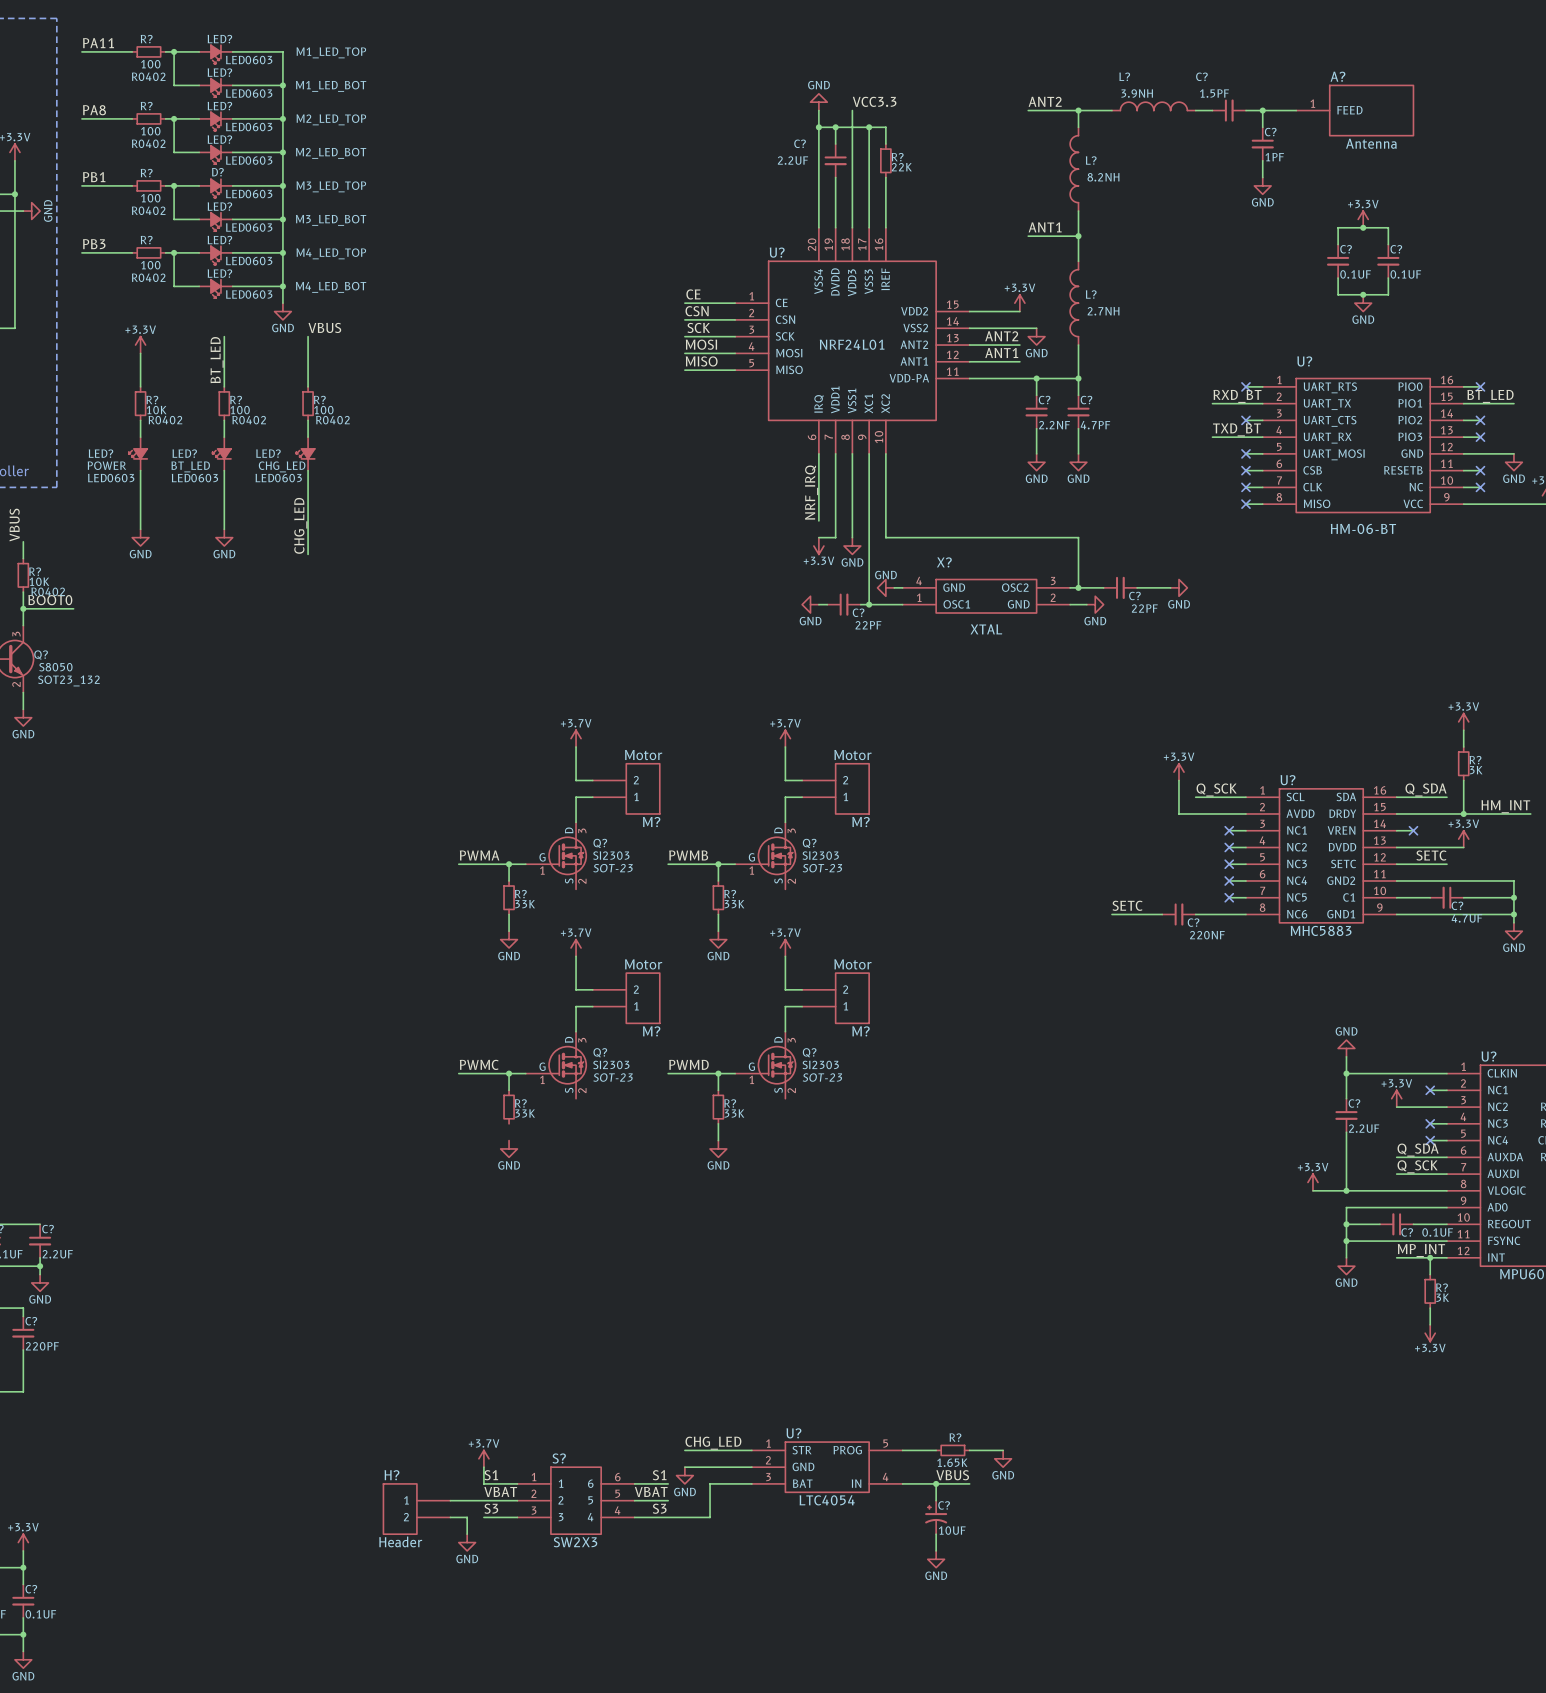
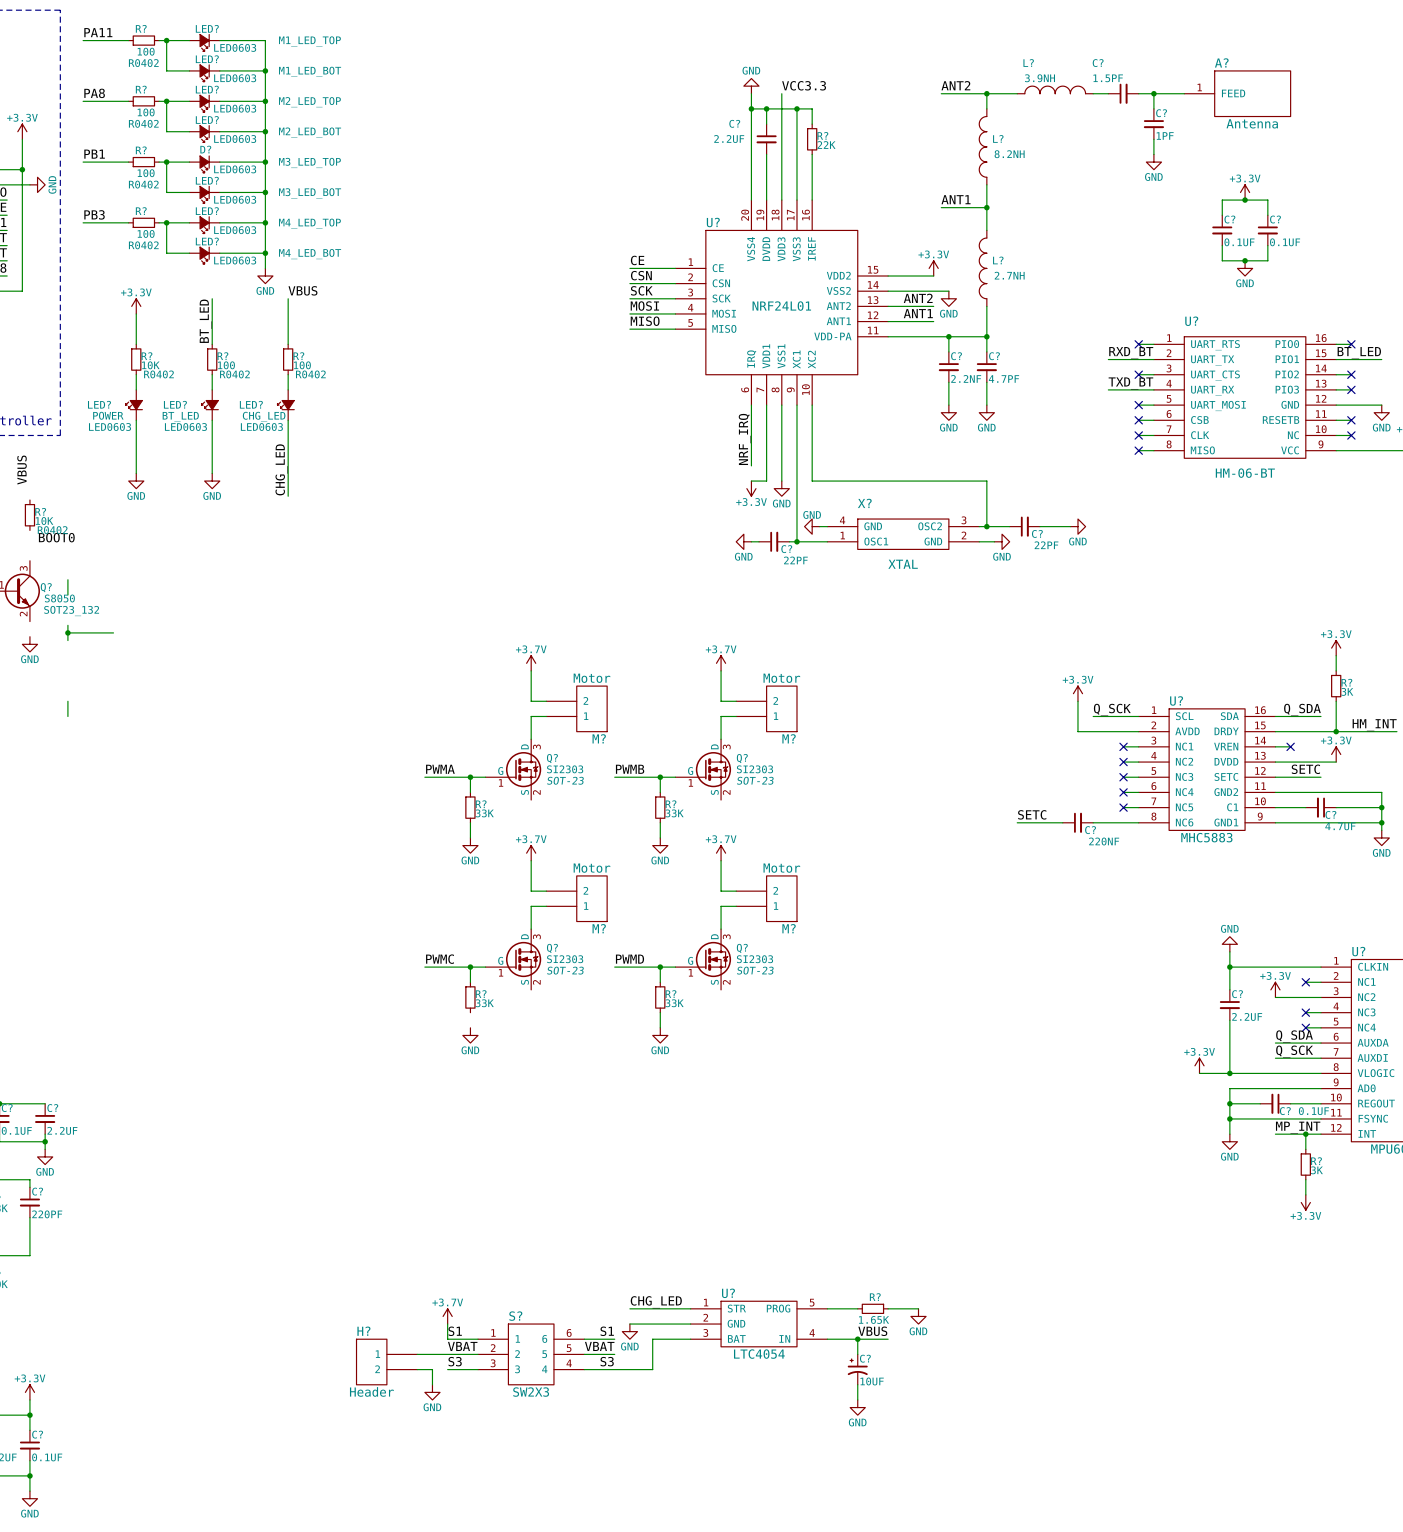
wire: (23, 541) (23, 558) -> (67, 579) (67, 594)
wire: (23, 592) (23, 625) -> none
wire: (23, 608) (73, 608) -> (67, 632) (113, 632)
junction: (23, 608) -> none
wire: (23, 692) (23, 709) -> (67, 701) (67, 716)
wire: none -> (67, 625) (67, 640)
junction: none -> (67, 632)

